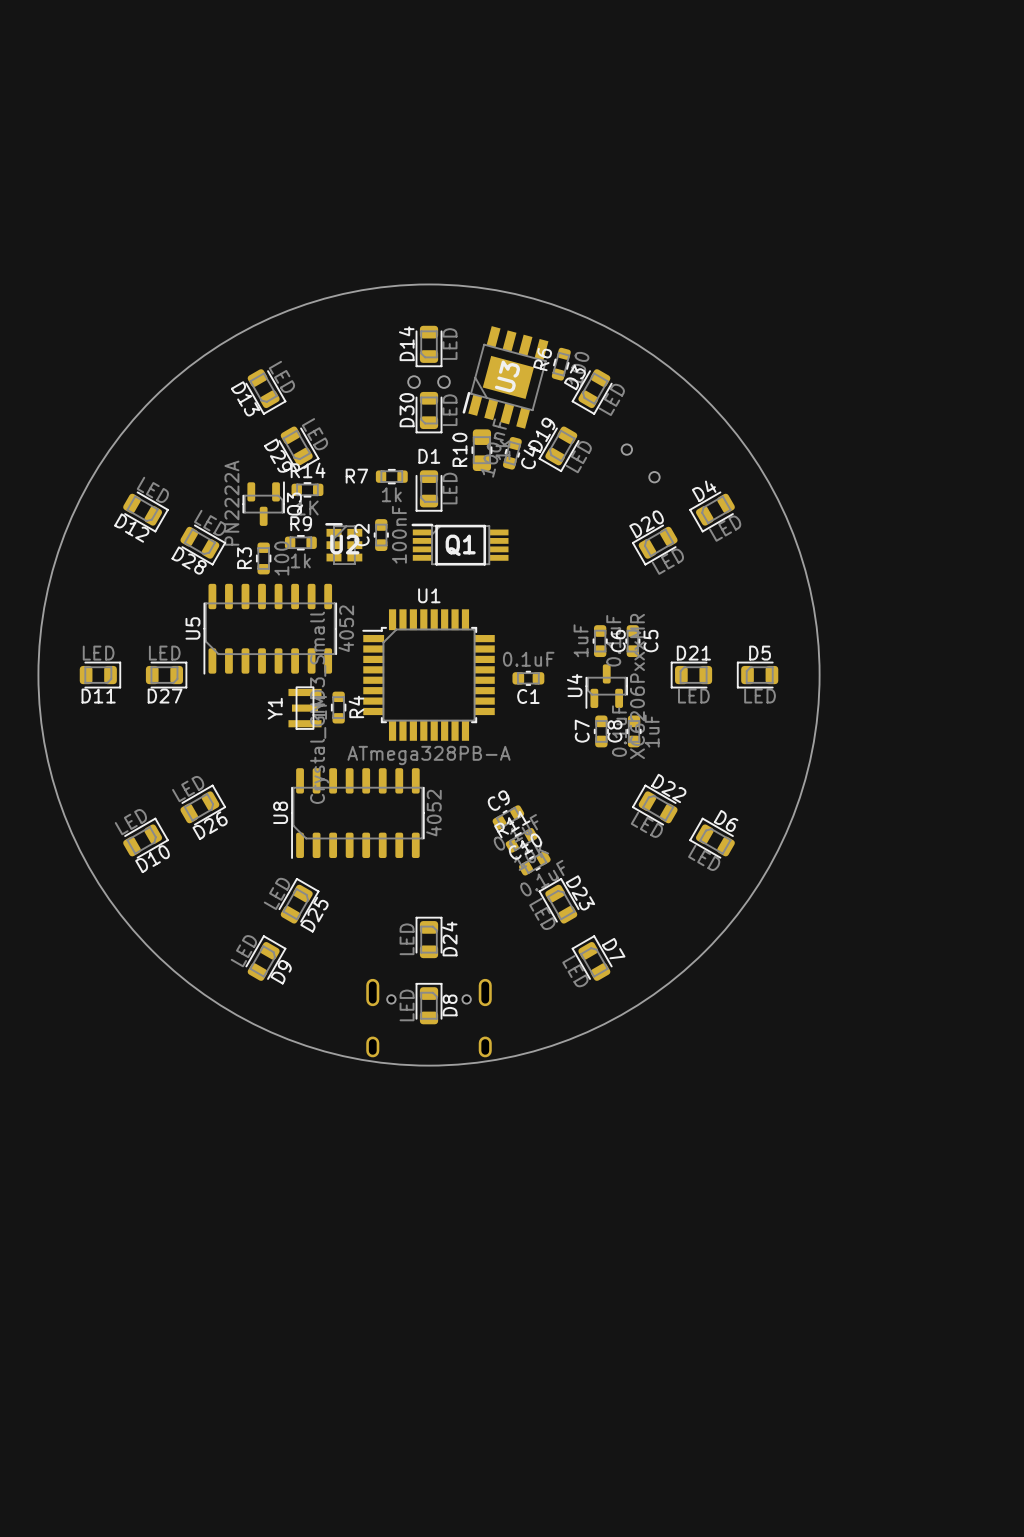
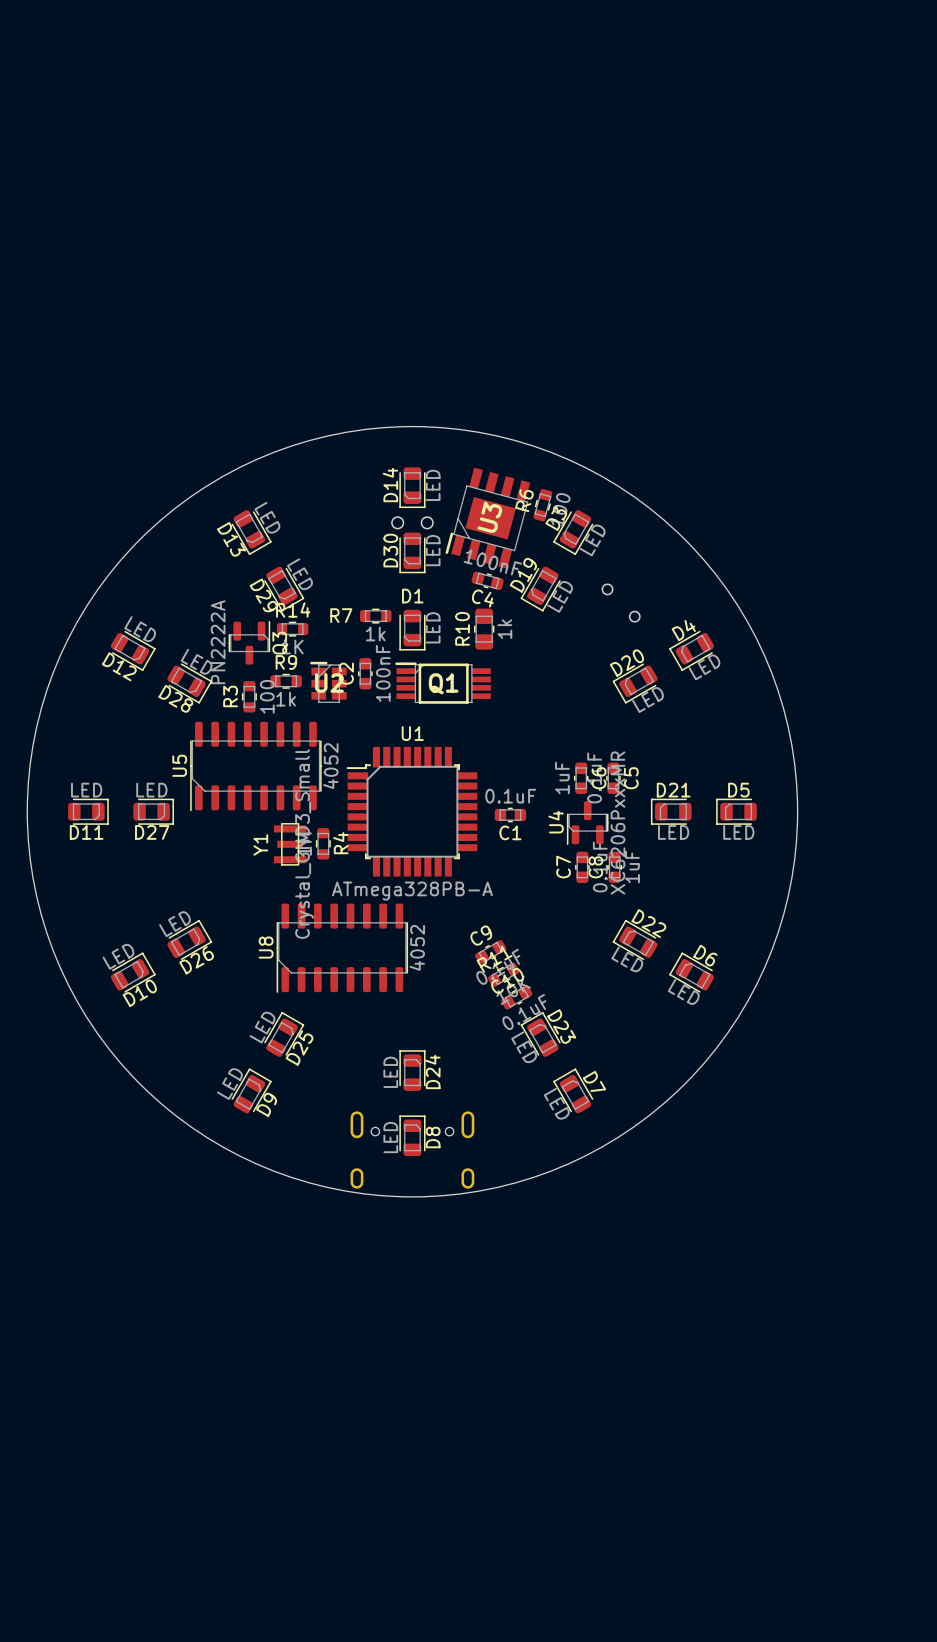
R10 position: (481, 450) -> (484, 629)
C4 rotation: 0° (512, 453) -> 90° clockwise (487, 580)

